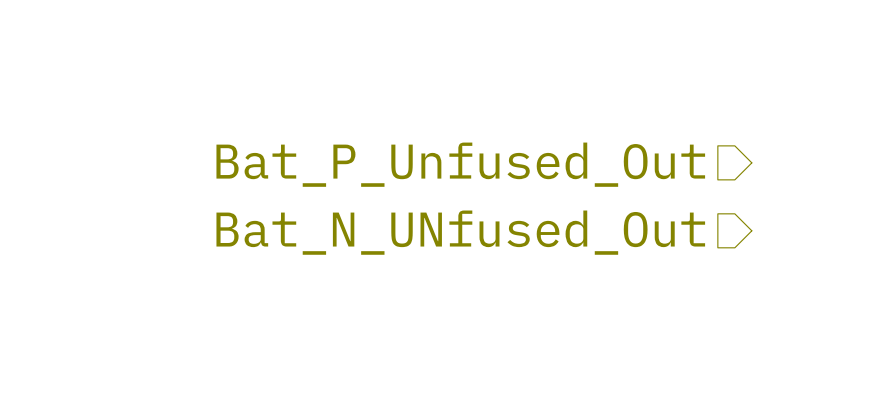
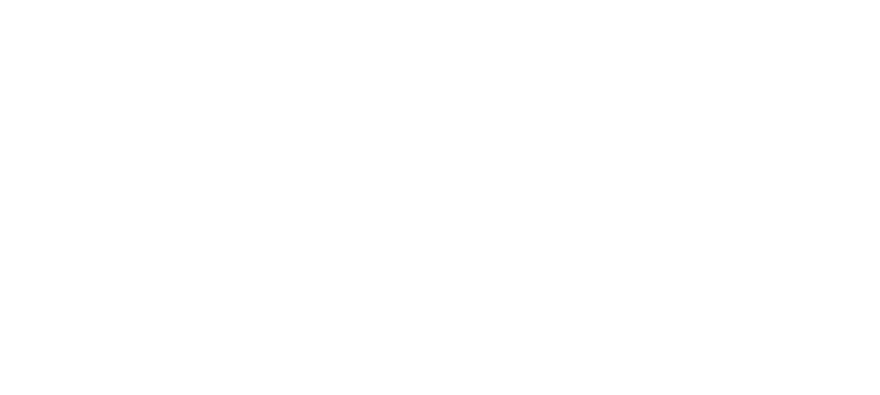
hierarchical label: Bat_P_Unfused_Out (460, 164) -> none
hierarchical label: Bat_N_UNfused_Out (460, 232) -> none

